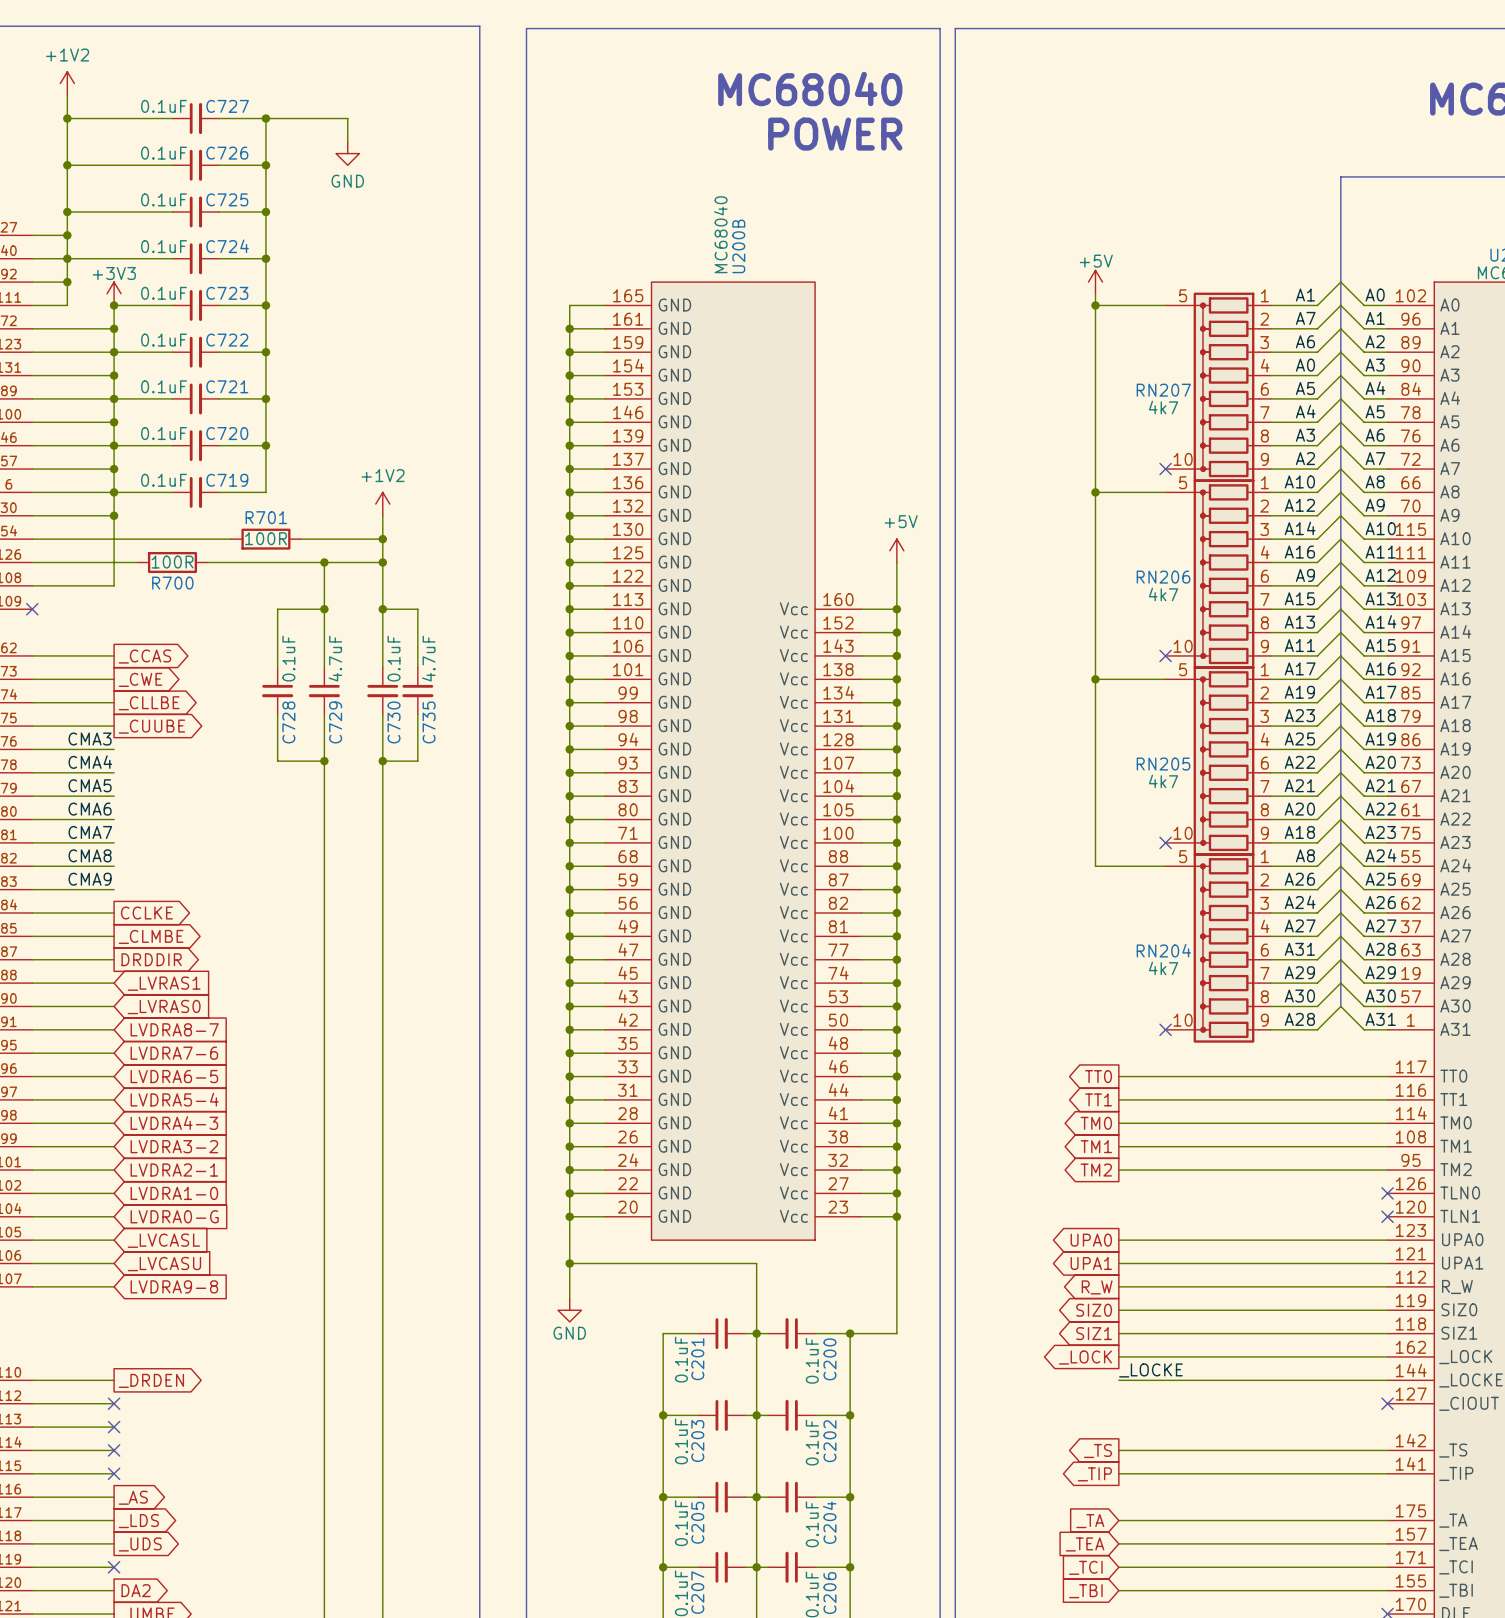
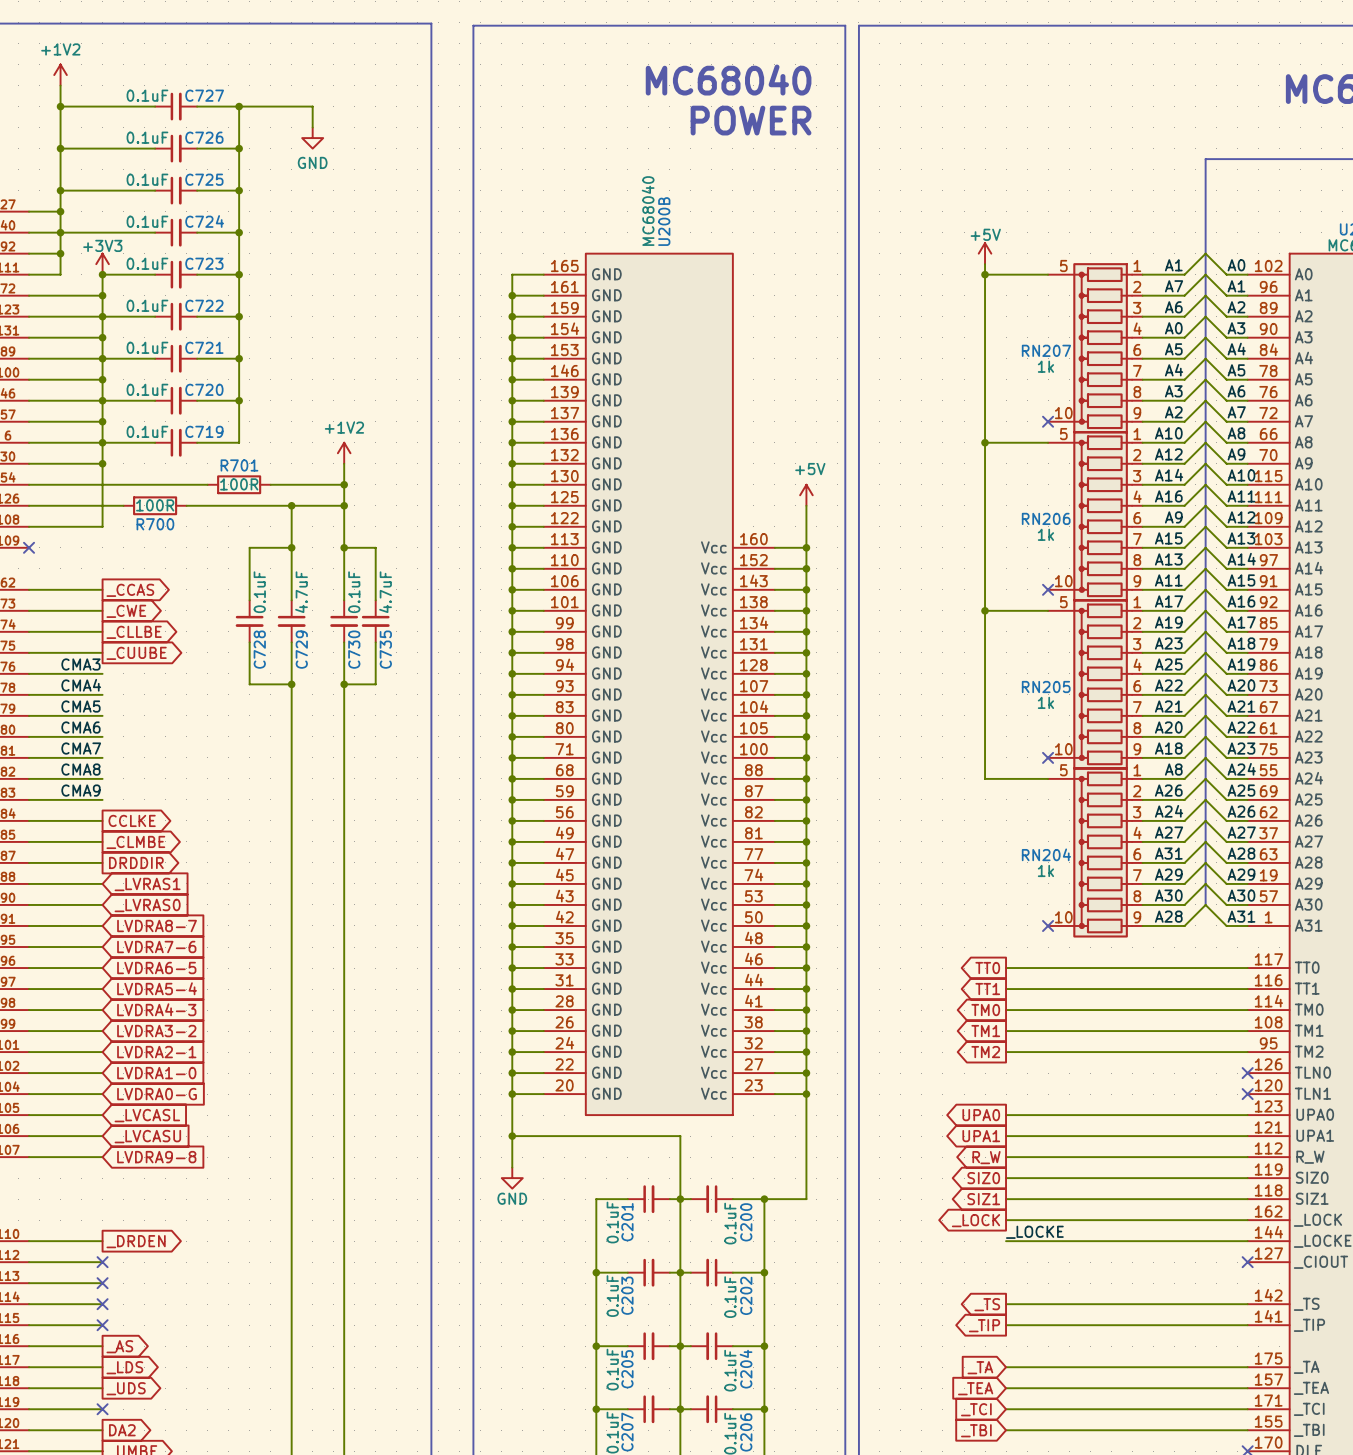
RN207 value: 4k7 (1163, 407) -> 1k (1045, 366)
RN206 value: 4k7 (1163, 594) -> 1k (1045, 534)
RN205 value: 4k7 (1163, 781) -> 1k (1045, 702)
RN204 value: 4k7 (1163, 968) -> 1k (1045, 870)

